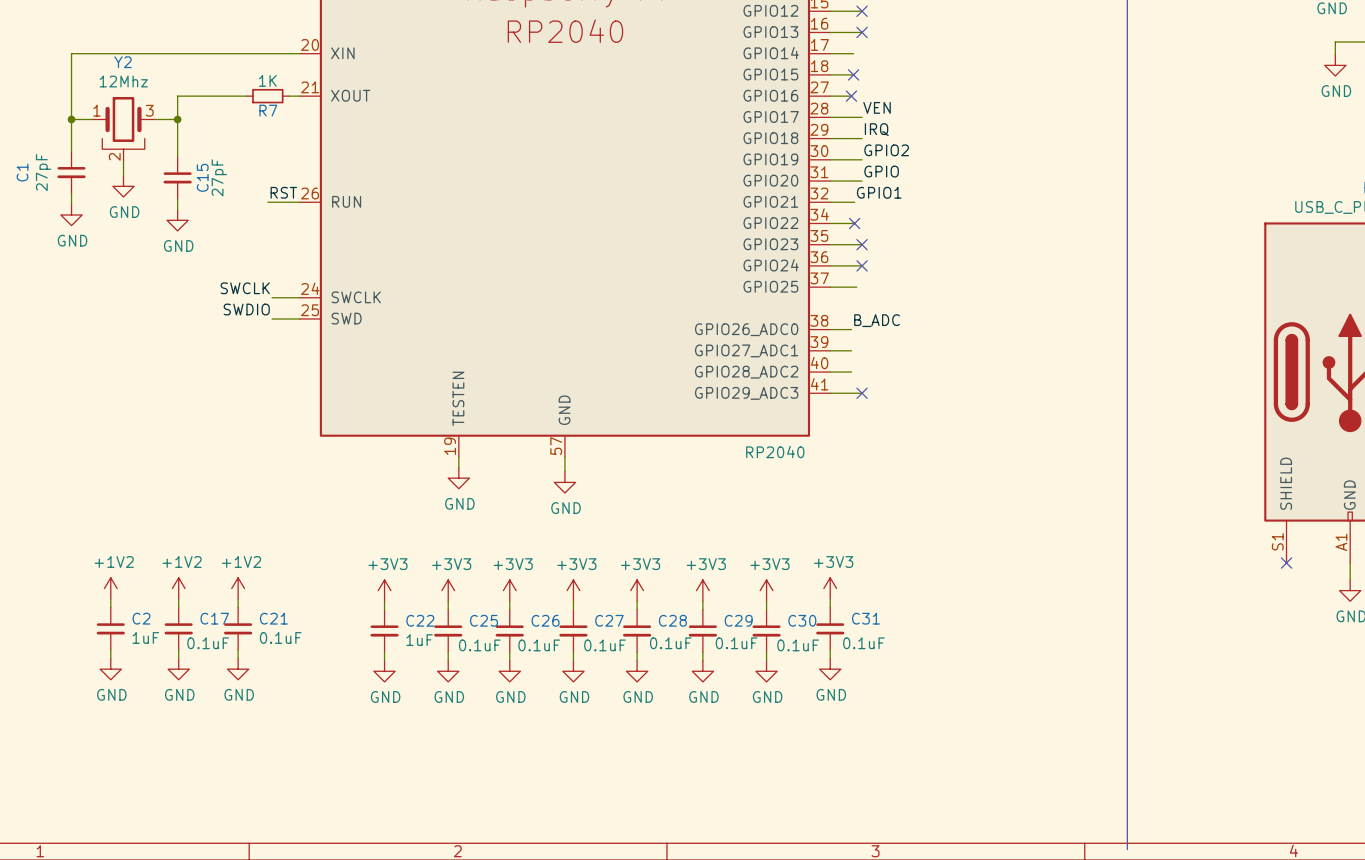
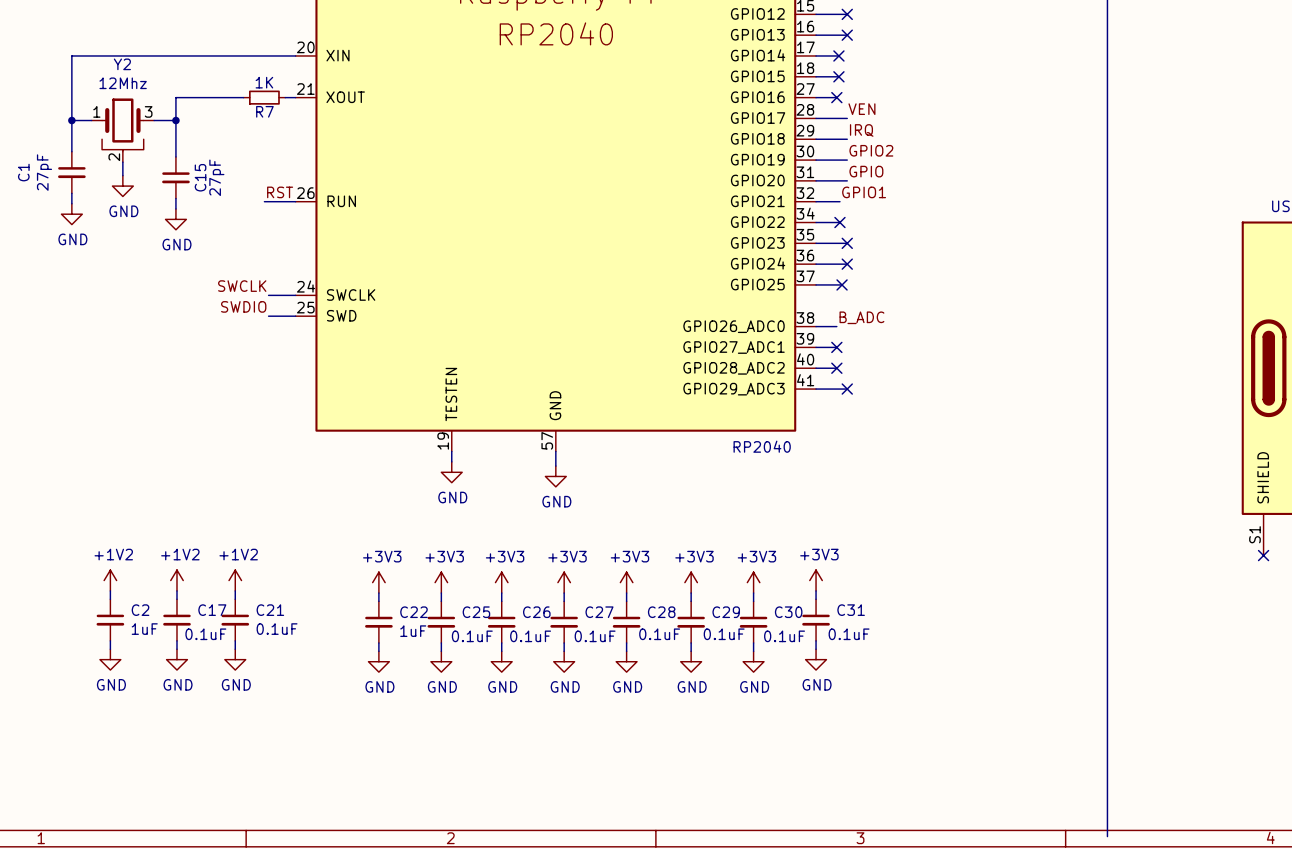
no-connect mark: none -> (838, 55)
no-connect mark: none -> (842, 284)
no-connect mark: none -> (836, 347)
no-connect mark: none -> (836, 368)

